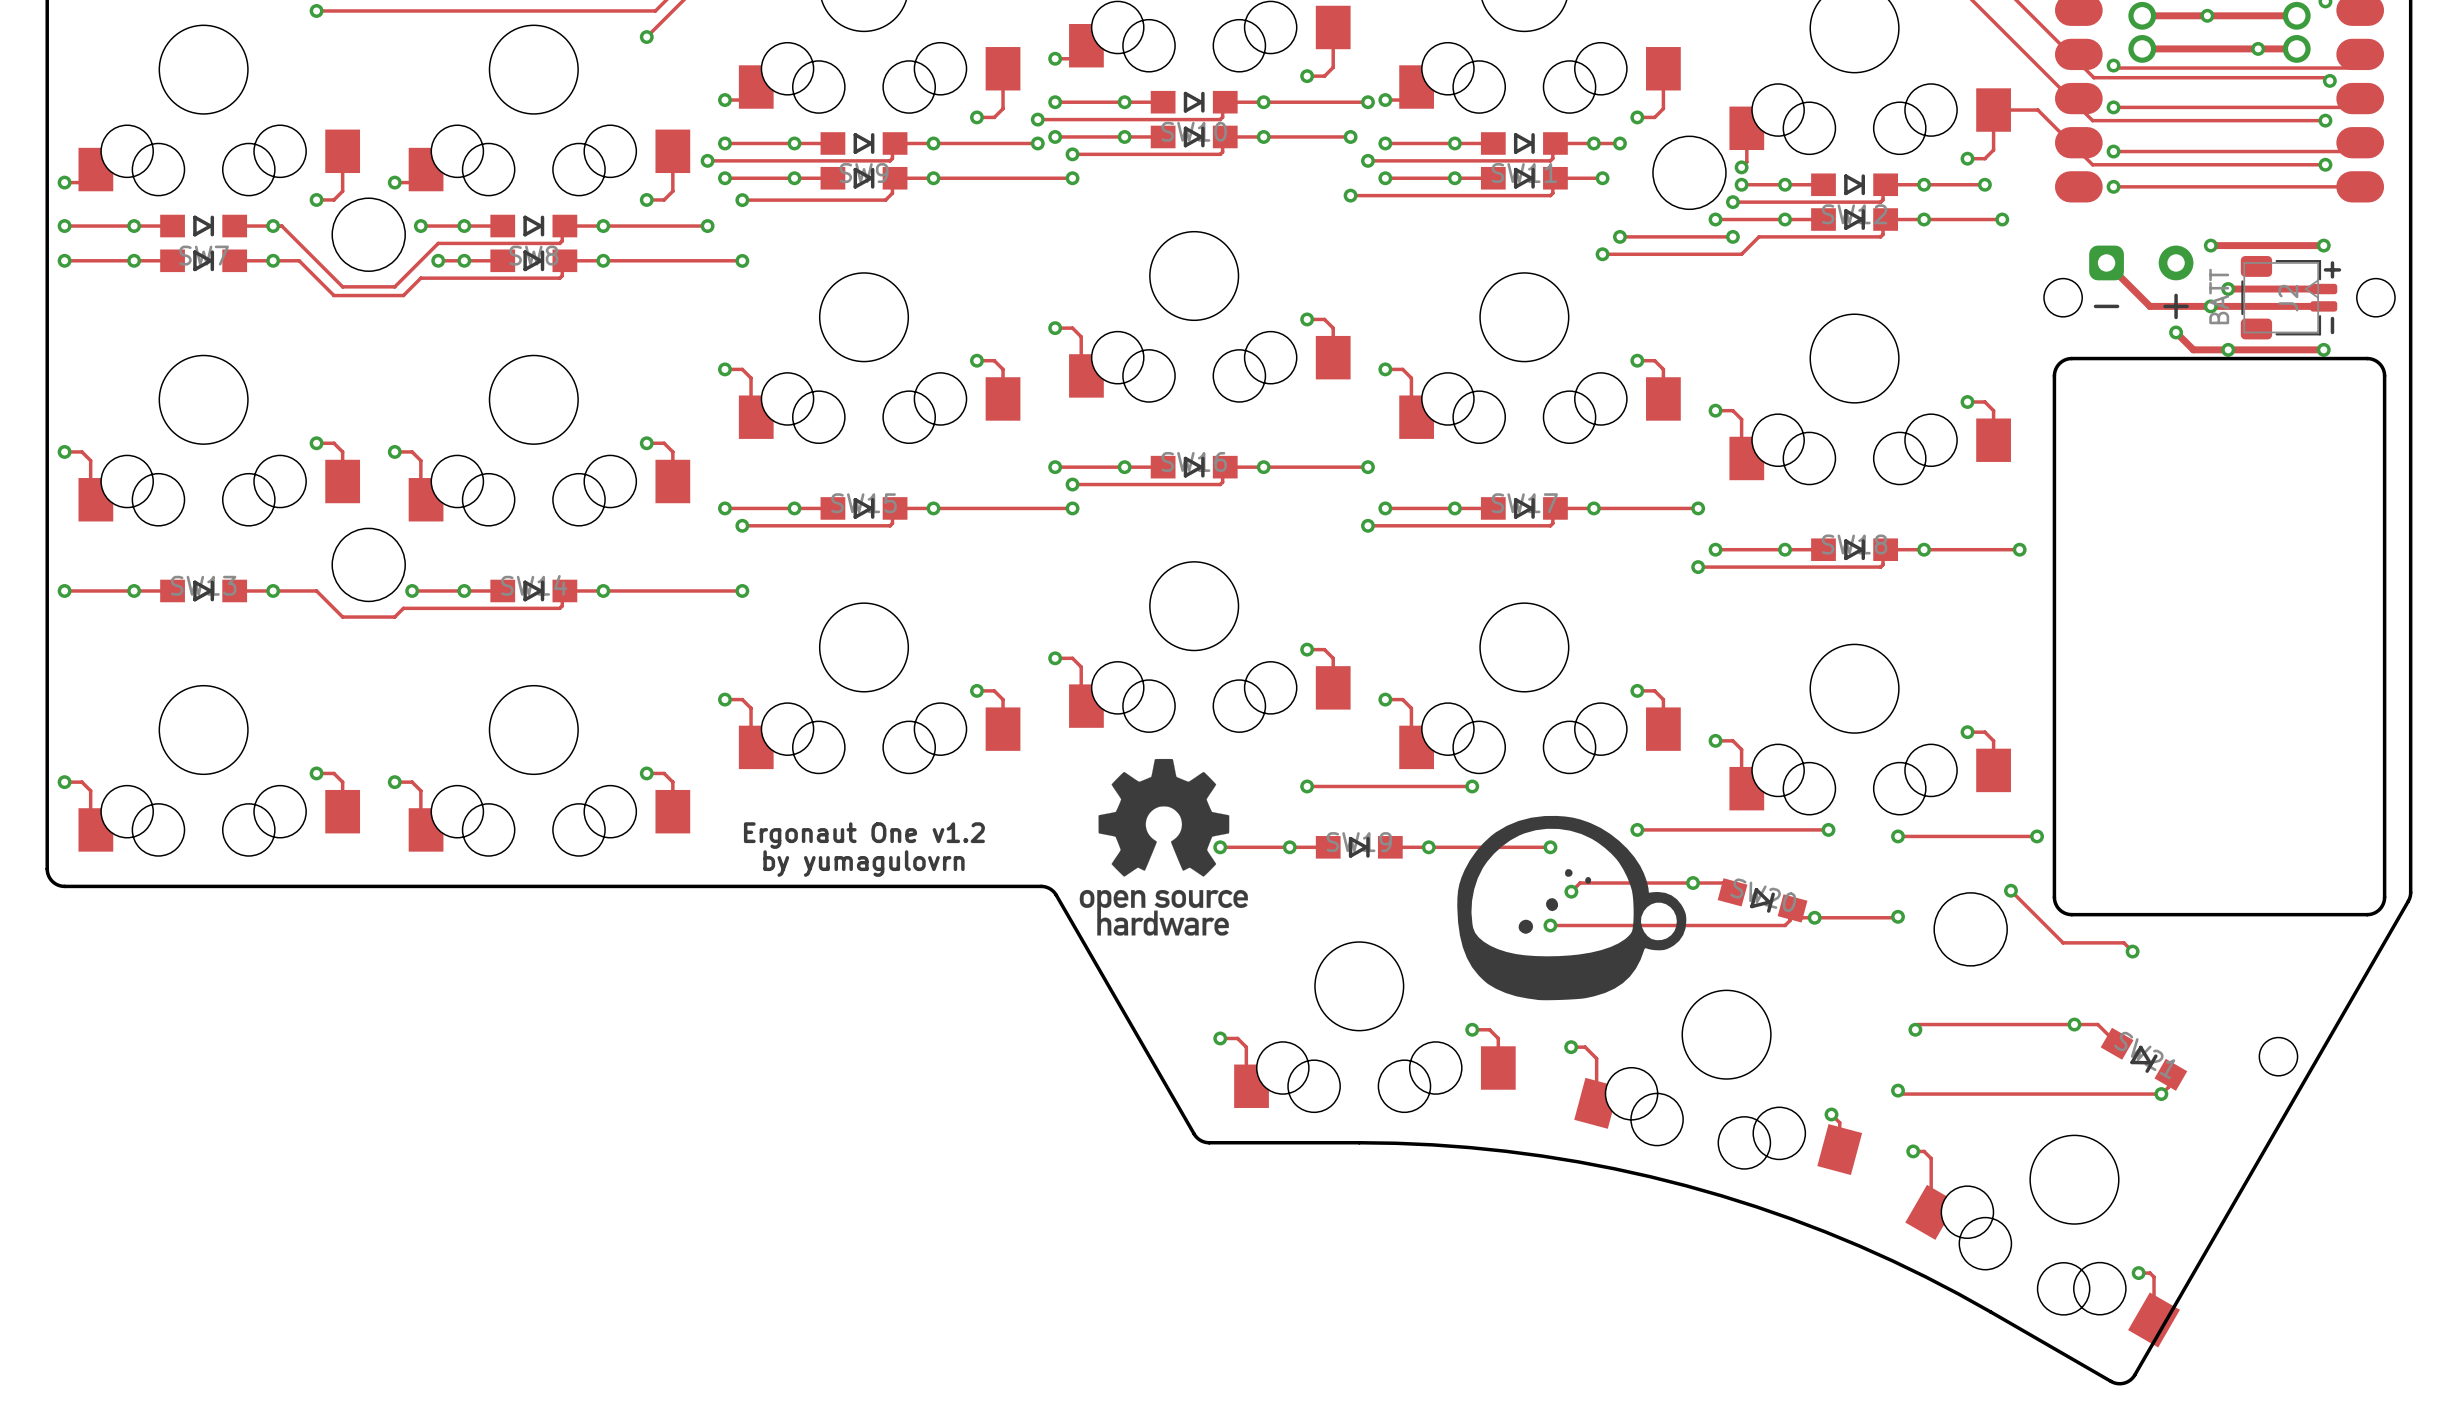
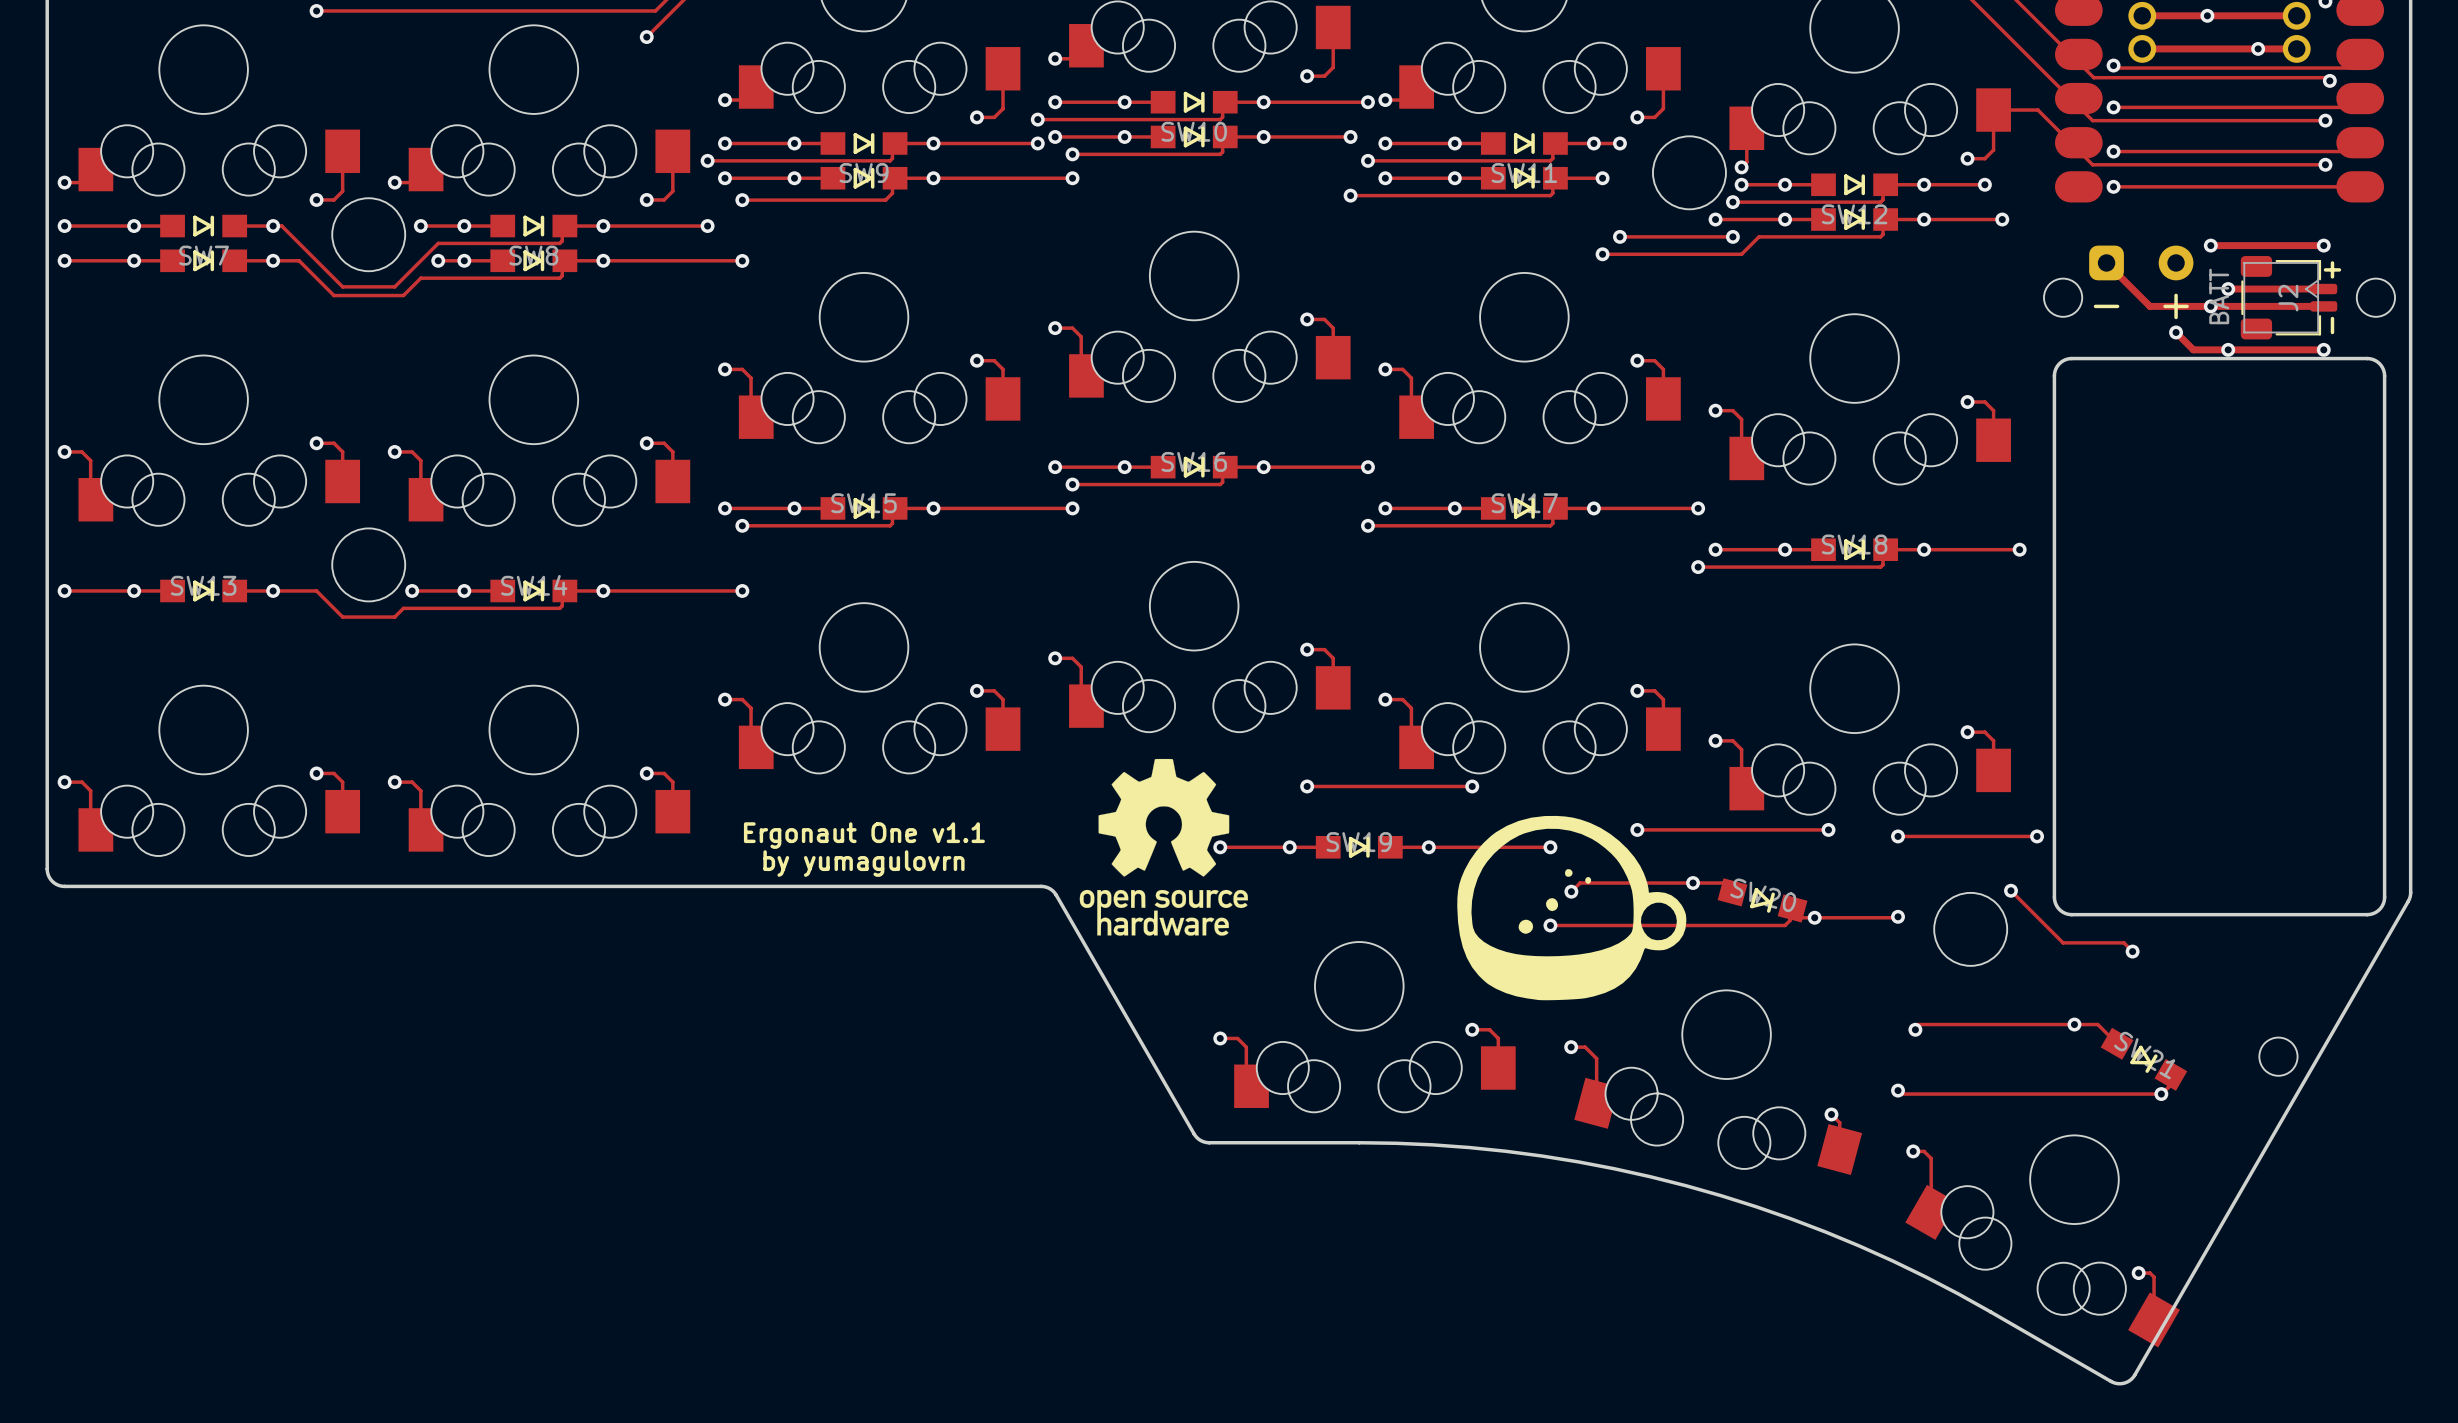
text: Ergonaut One v1.2 (864, 835) -> Ergonaut One v1.1 (864, 835)

